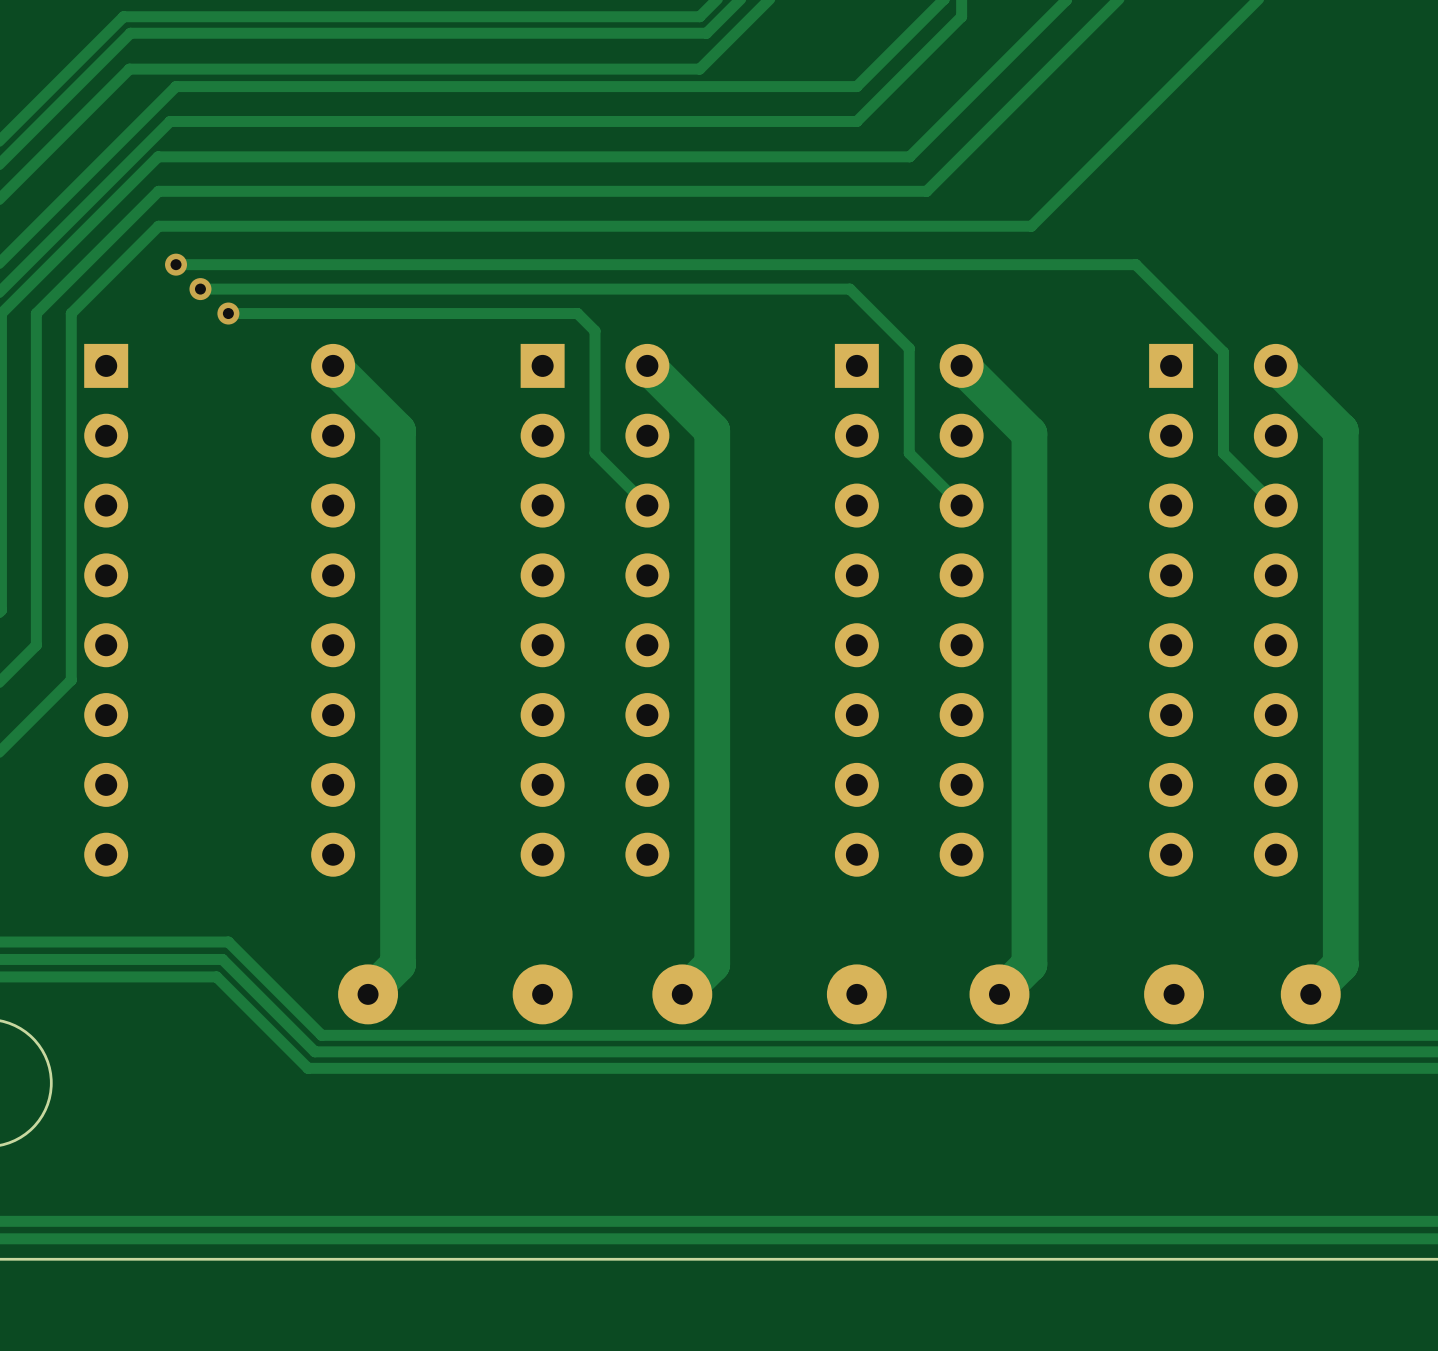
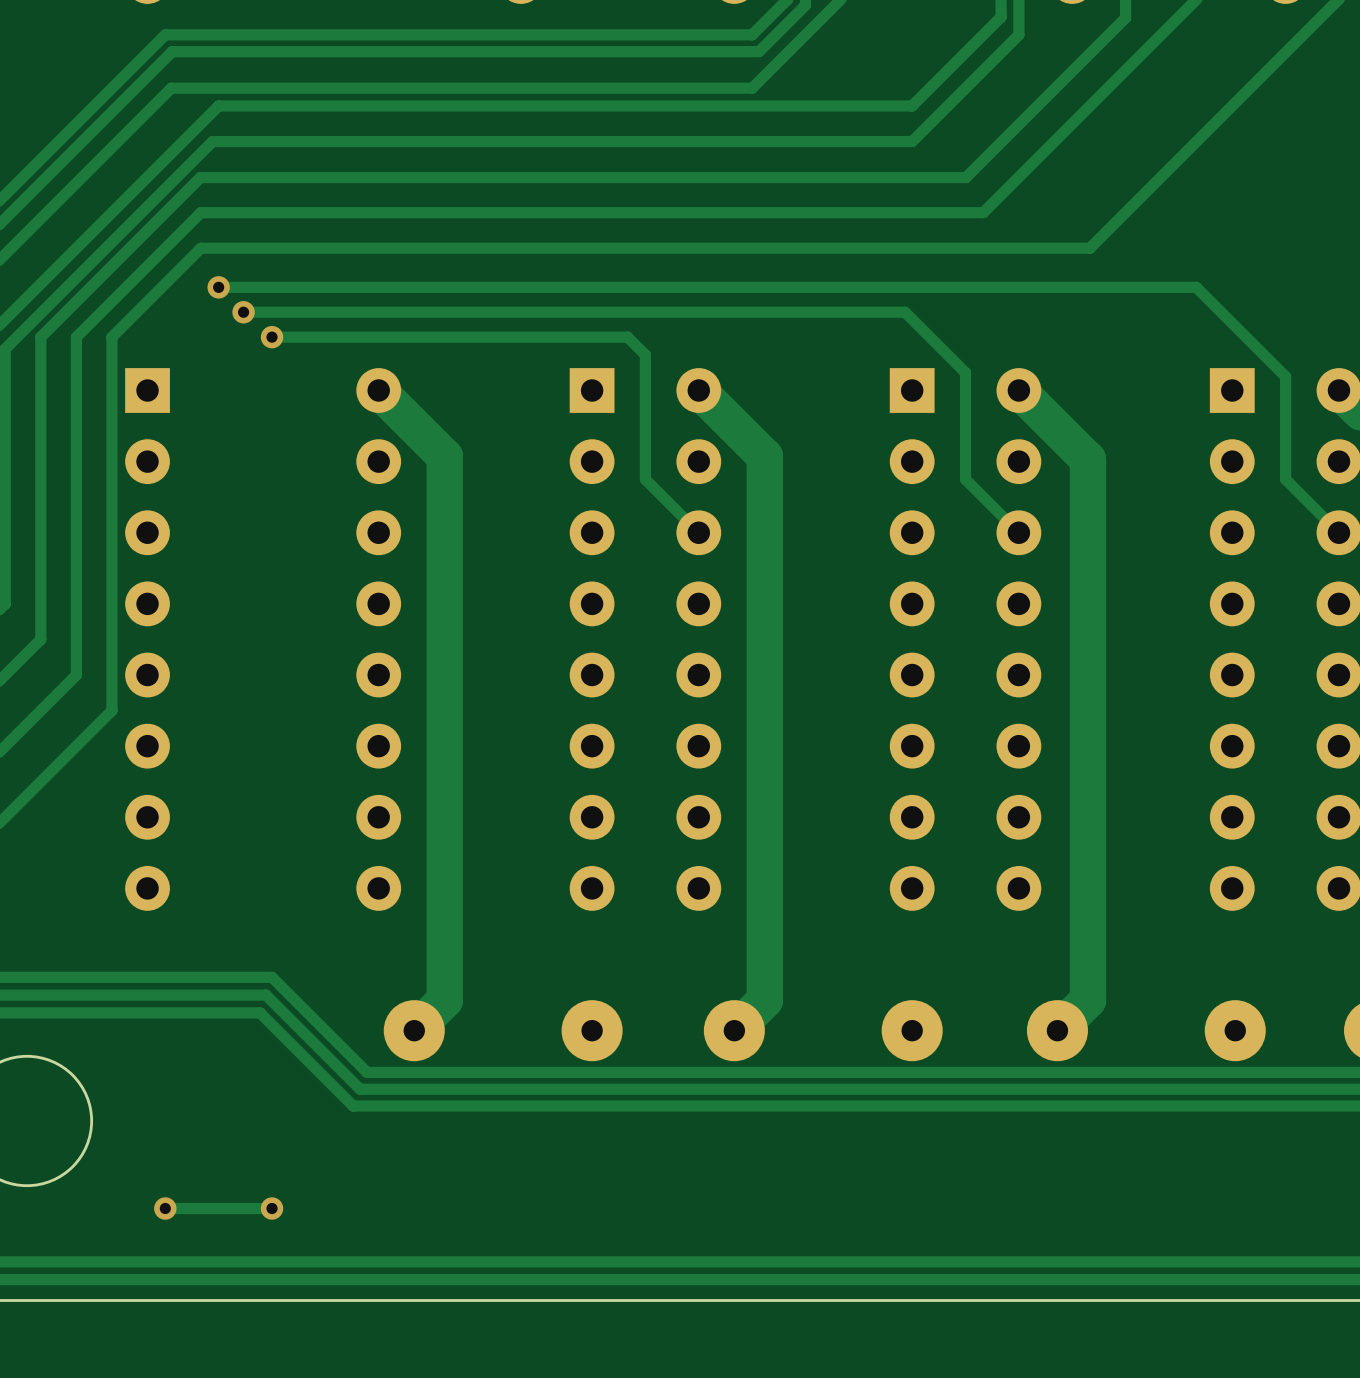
via: none -> (165, 1208)
track: none -> (272, 1208) (165, 1208)
via: none -> (272, 1208)

